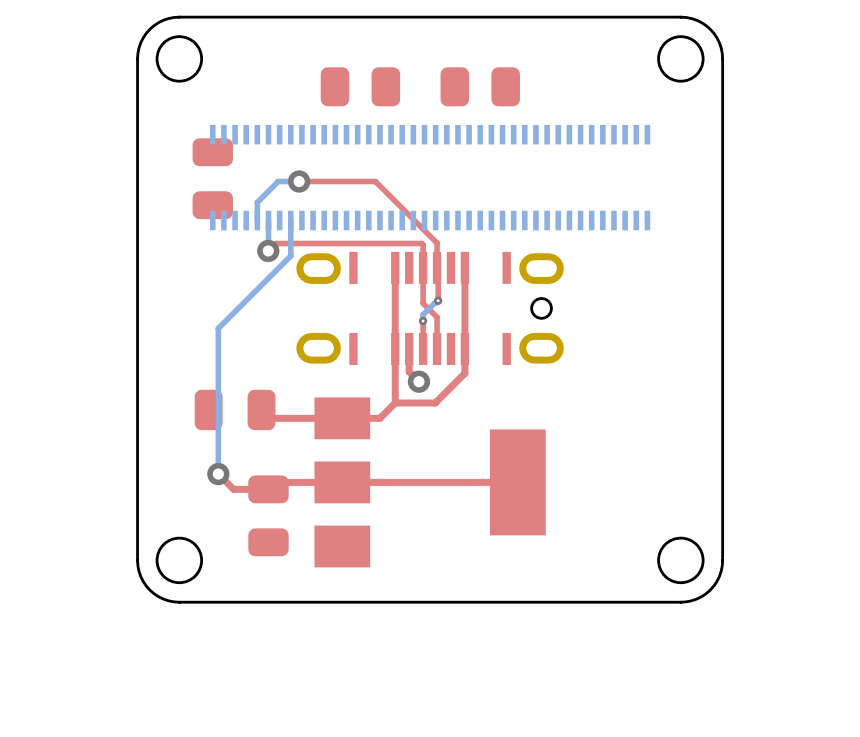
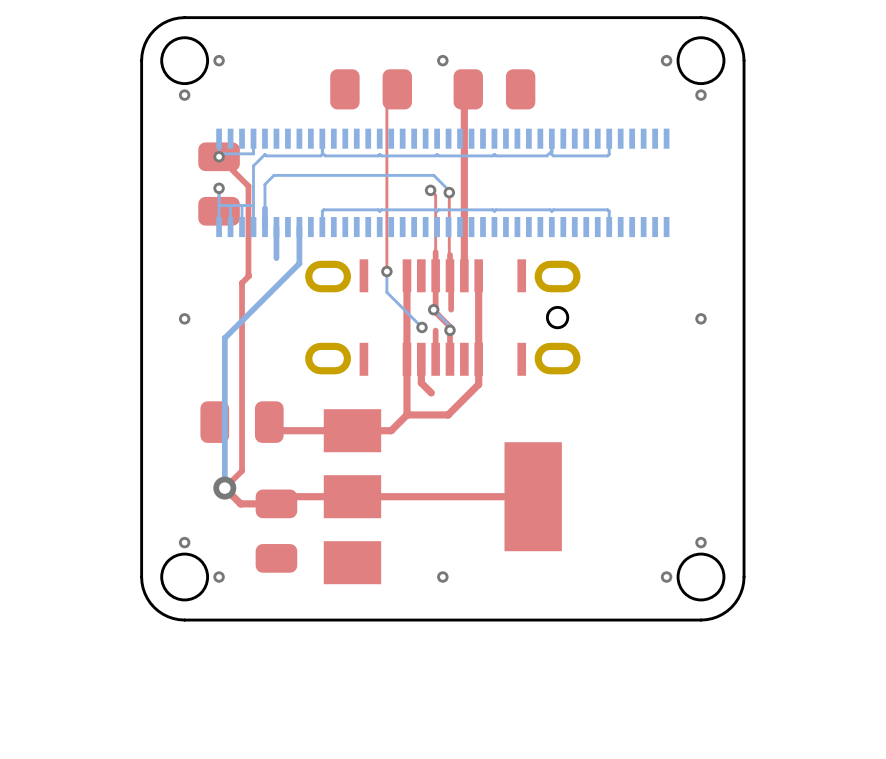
via: none -> (219, 60)
via: none -> (442, 60)
via: none -> (666, 60)
top track: none -> (397, 89) (386, 99) (386, 271)
top track: none -> (468, 89) (464, 93) (464, 275)
via: none -> (184, 95)
via: none -> (701, 95)
bottom track: none -> (253, 138) (253, 153) (219, 153) (219, 138)
bottom track: none -> (322, 138) (320, 155) (264, 154) (253, 165) (253, 227)
bottom track: none -> (609, 138) (607, 155) (553, 155) (551, 138)
bottom track: none -> (551, 151) (546, 155) (325, 155) (322, 153)
top track: none -> (219, 156) (248, 186) (249, 275) (242, 282) (242, 470) (224, 488)
via: none -> (219, 156)
top track: (299, 181) (375, 181) (437, 243) (437, 247) -> (449, 192) (449, 255)
bottom track: (299, 181) (278, 181) (257, 202) -> (449, 192) (433, 175) (273, 175) (264, 184) (264, 208)
via: (299, 181) -> none
bottom track: none -> (219, 188) (219, 227)
via: none -> (219, 188)
via: none -> (430, 190)
via: none -> (449, 192)
bottom track: none -> (230, 205) (230, 227)
bottom track: none -> (242, 205) (242, 227)
bottom track: none -> (253, 205) (219, 205)
bottom track: none -> (609, 227) (607, 209) (323, 209) (322, 227)
top track: (423, 244) (275, 243) (268, 250) -> (435, 252) (435, 195) (430, 190)
via: (268, 250) -> none
bottom track: none -> (386, 271) (386, 292) (422, 327)
via: none -> (386, 271)
bottom track: none -> (433, 309) (449, 326) (449, 330)
via: none -> (433, 309)
bottom track: (438, 300) (423, 314) (423, 321) -> none
via: (438, 300) -> none
via: none -> (184, 318)
via: none -> (701, 318)
via: none -> (422, 327)
via: none -> (449, 330)
via: (423, 321) -> none
via: (418, 381) -> none
via: none -> (184, 542)
via: none -> (701, 542)
via: none -> (219, 577)
via: none -> (442, 577)
via: none -> (666, 577)

